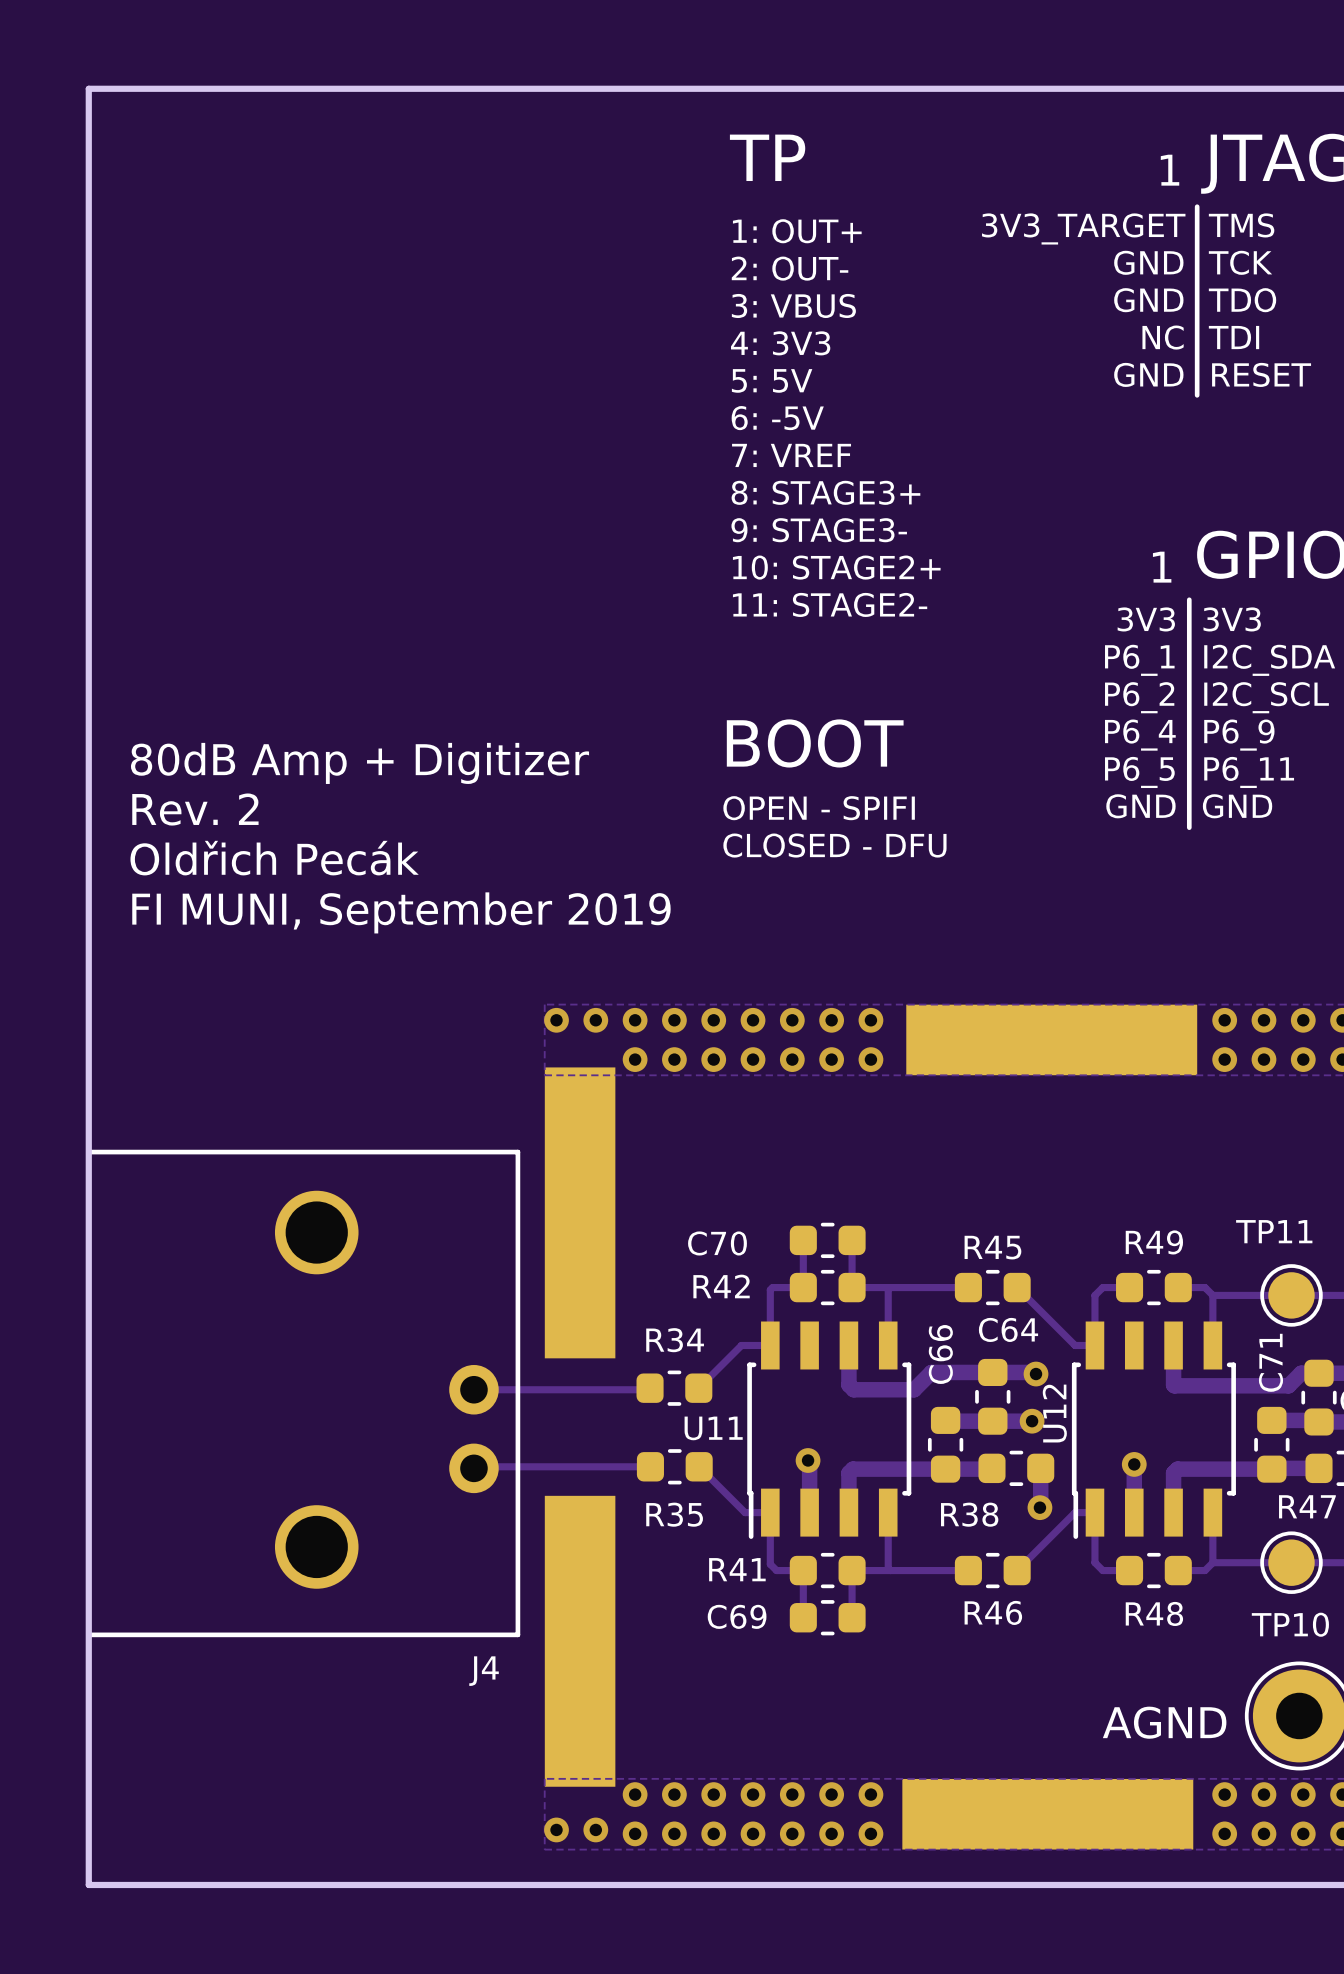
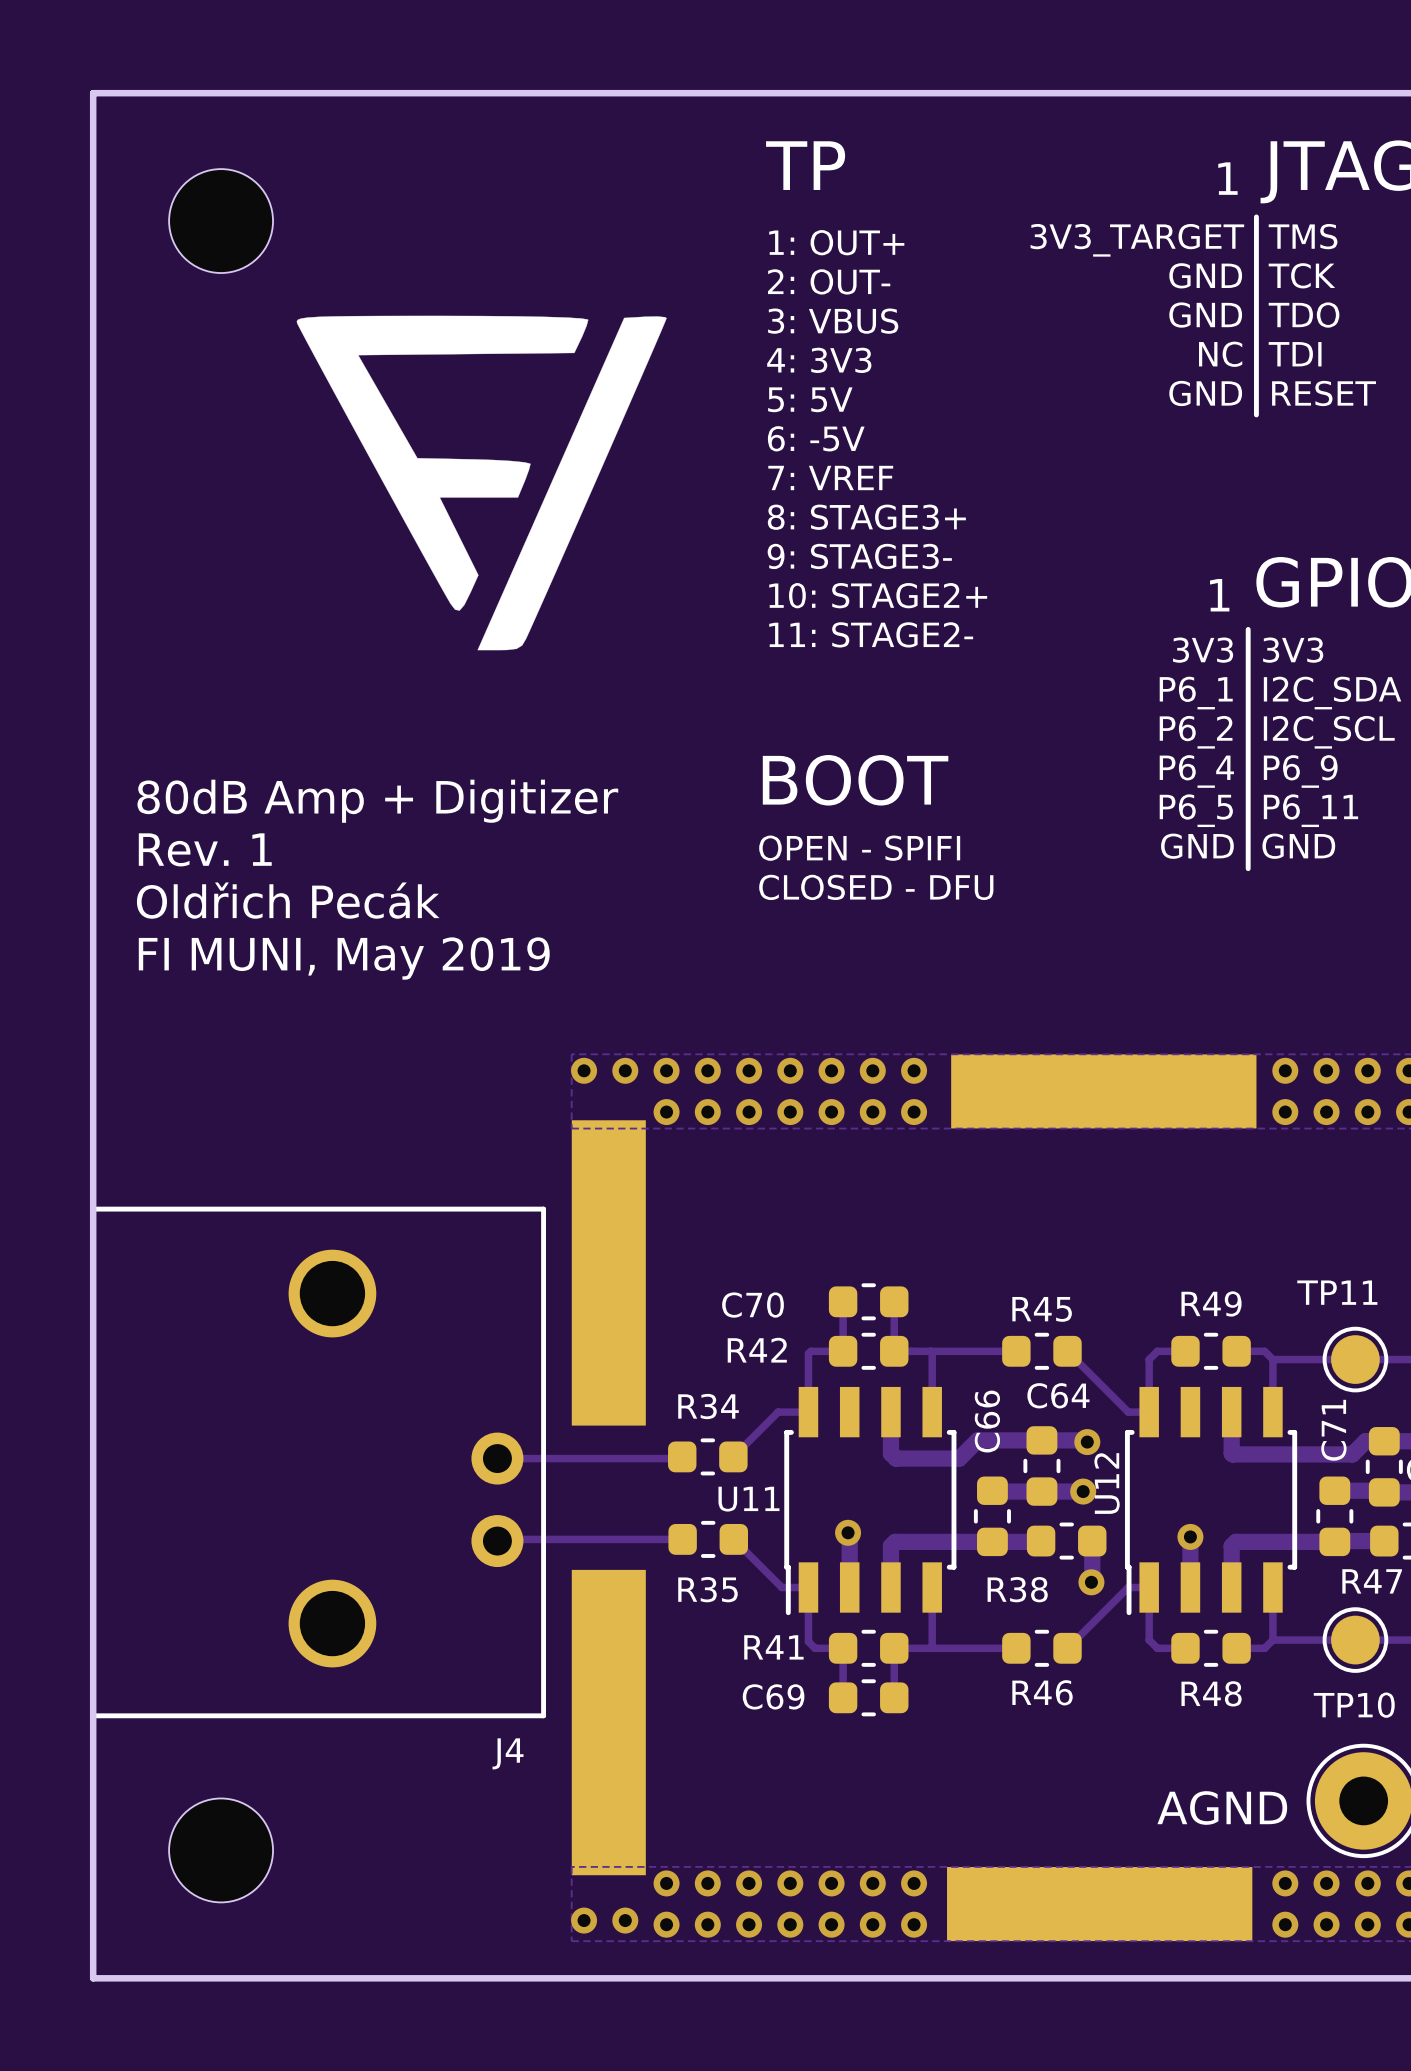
part: none -> (221, 221)
drawing: none -> [296, 315, 667, 651]
text: Rev. 2 (195, 809) -> Rev. 1 (205, 849)
text: FI MUNI, September 2019 (401, 912) -> FI MUNI, May 2019 (344, 958)
part: none -> (221, 1850)

